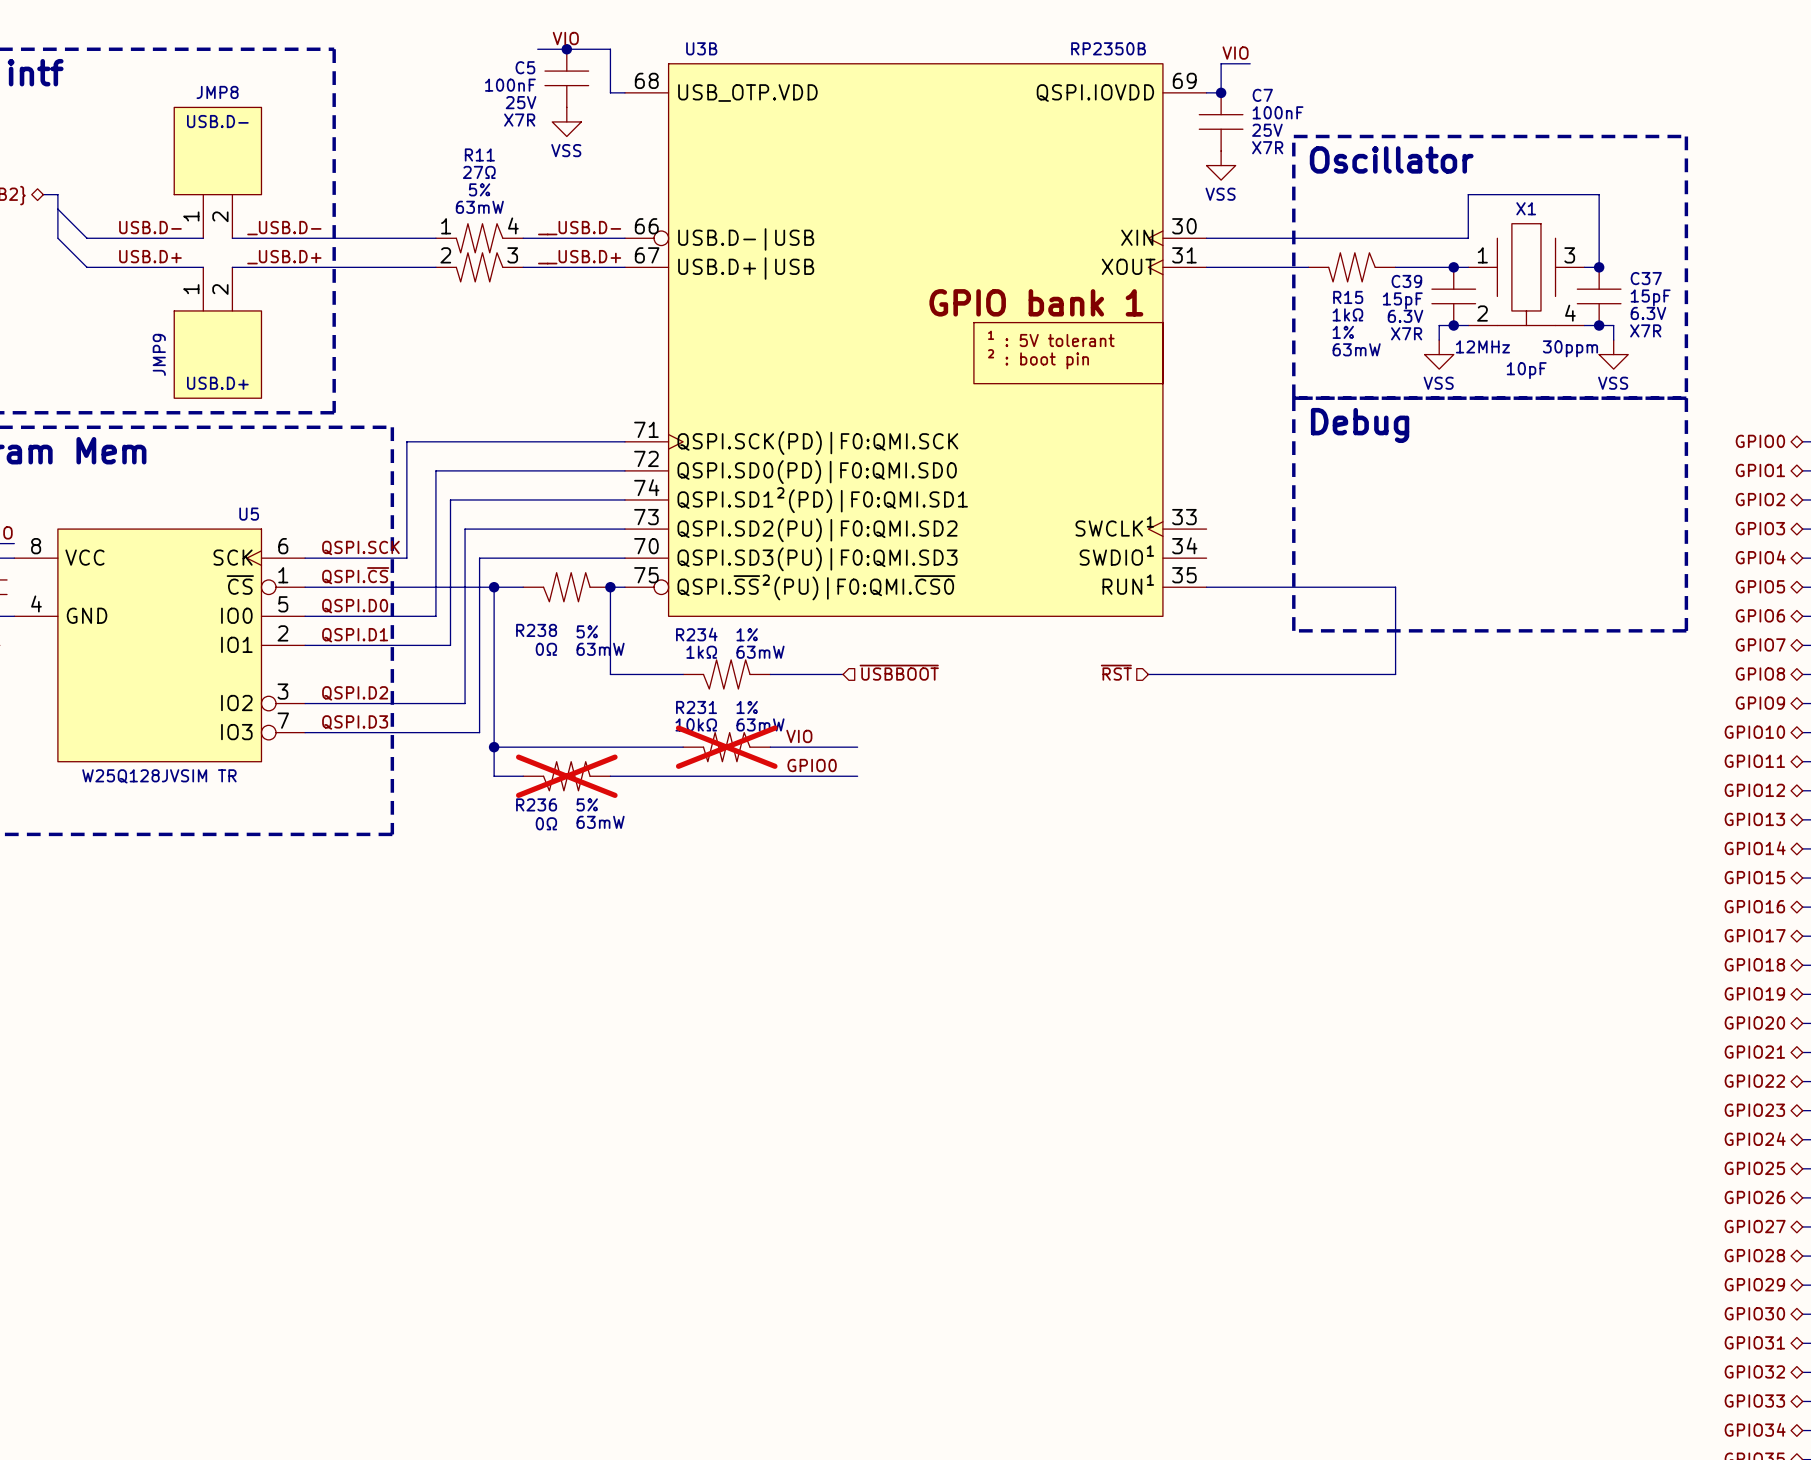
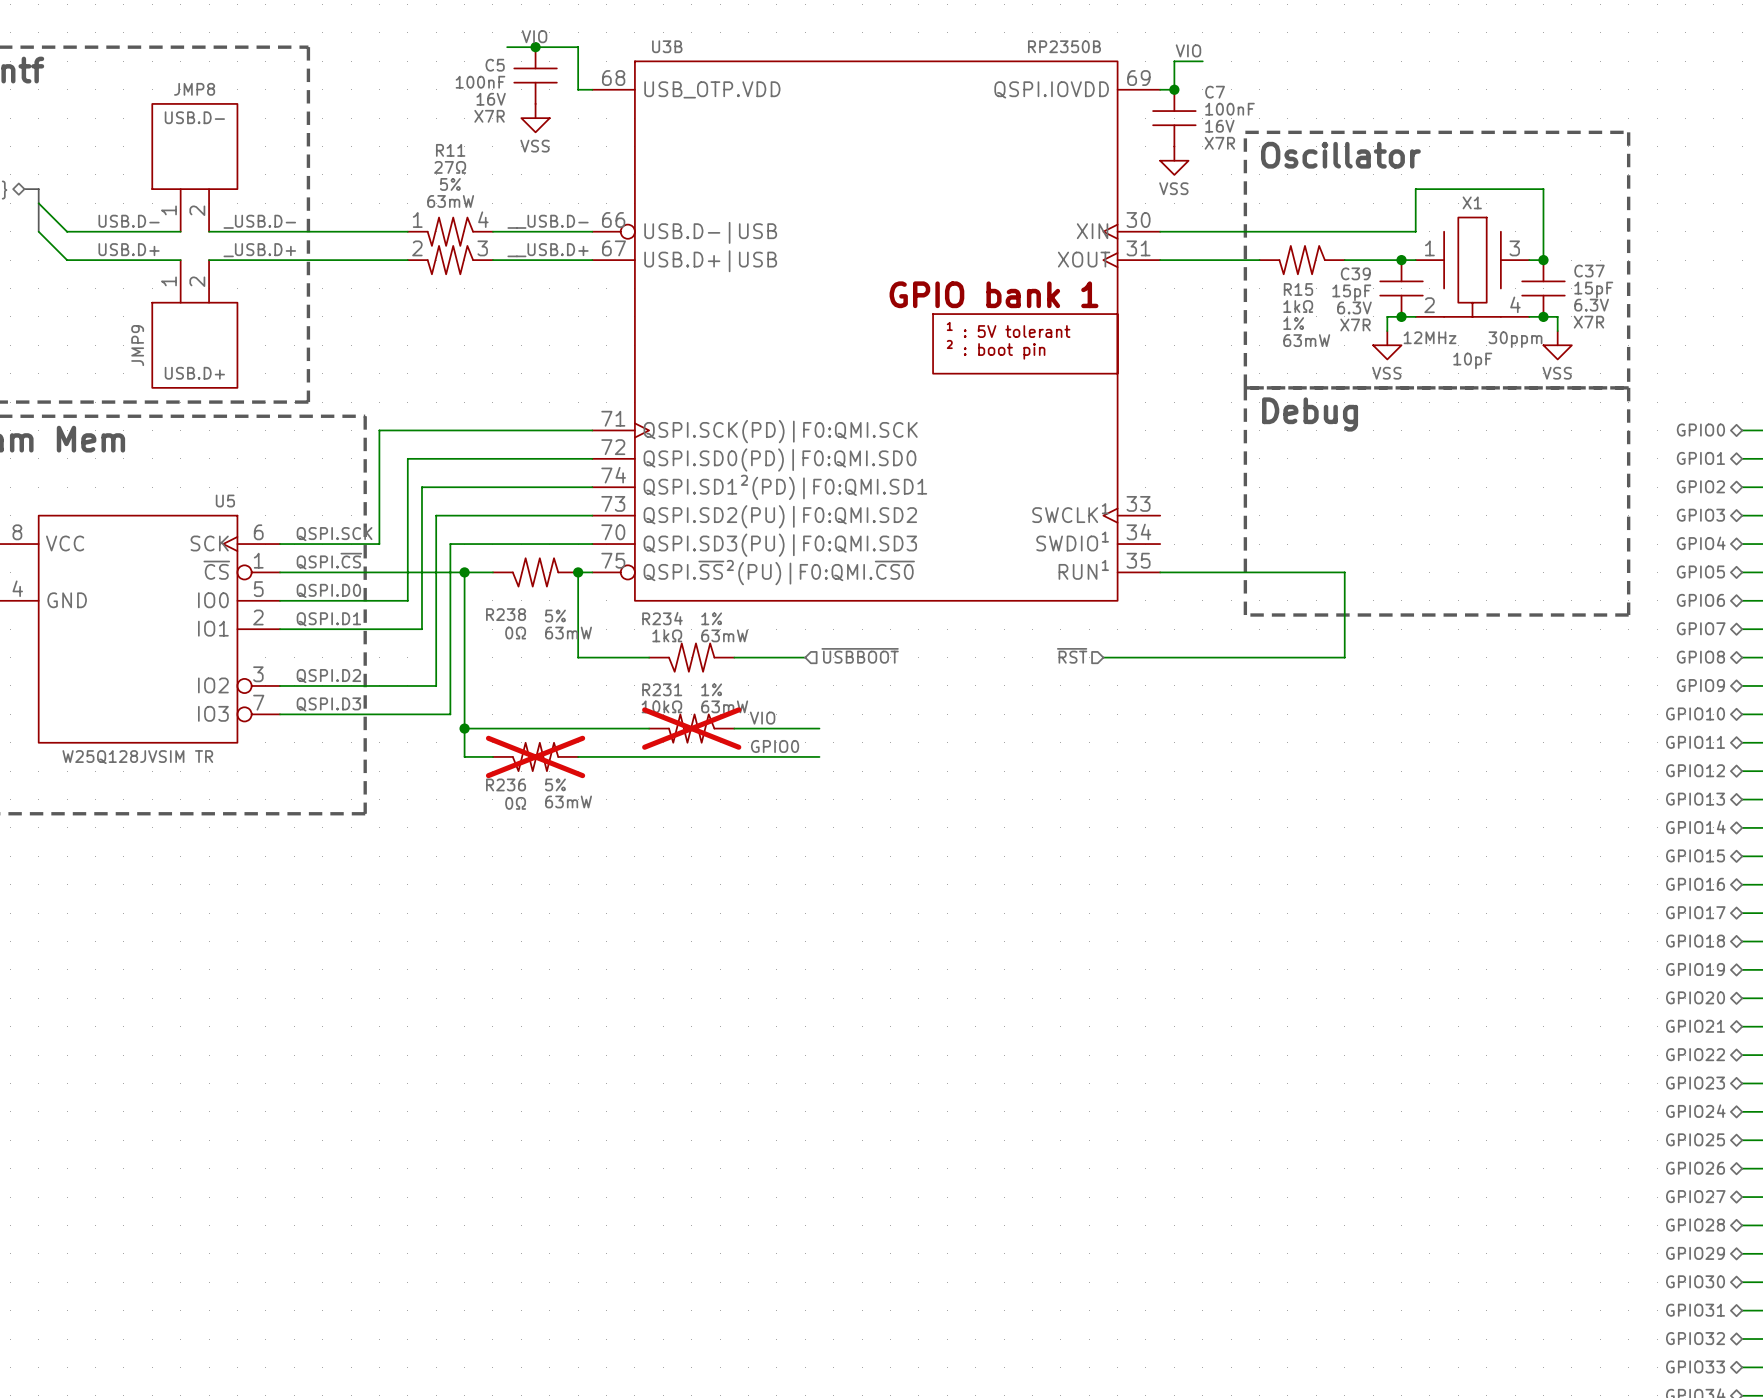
C5 text: 25V (521, 102) -> 16V (491, 99)
C7 text: 25V (1267, 130) -> 16V (1219, 126)

